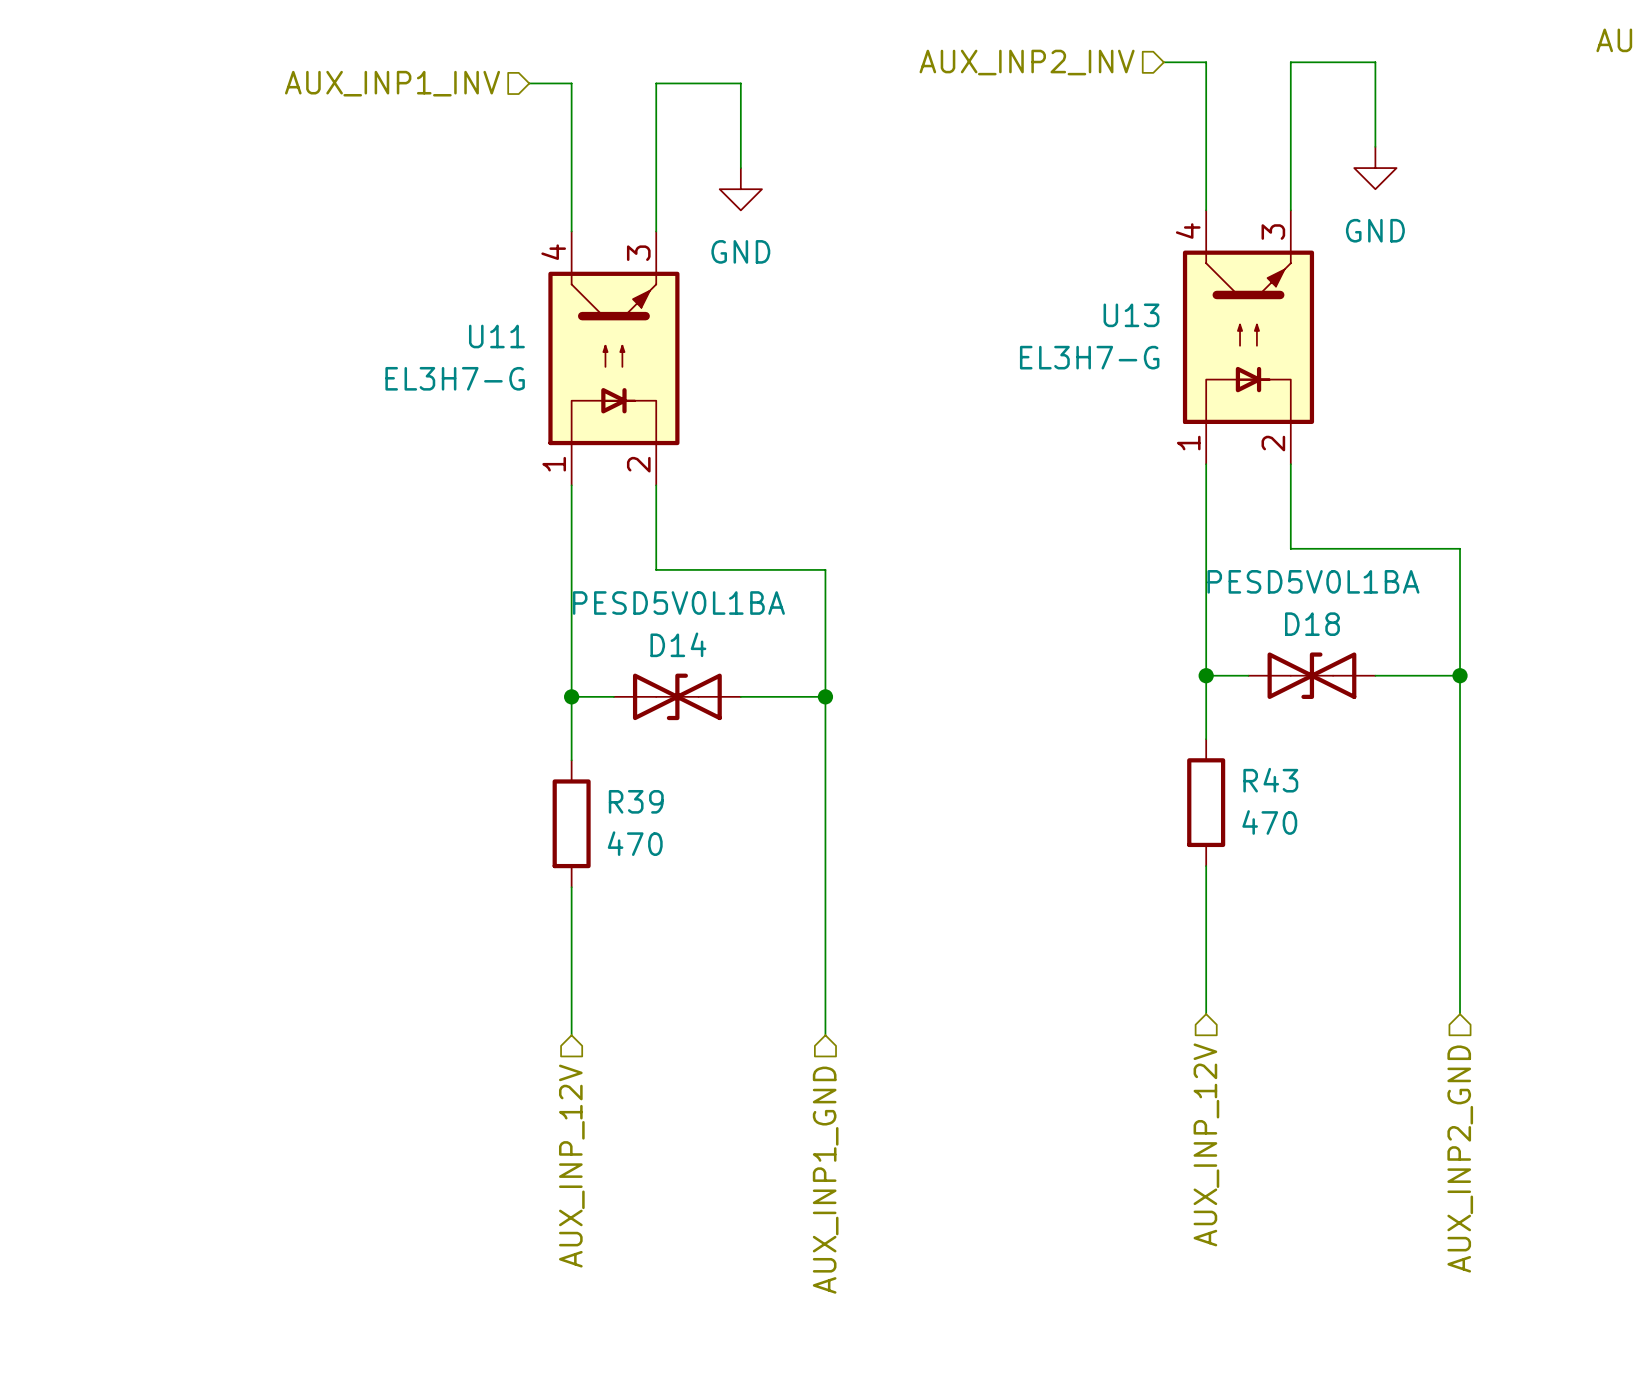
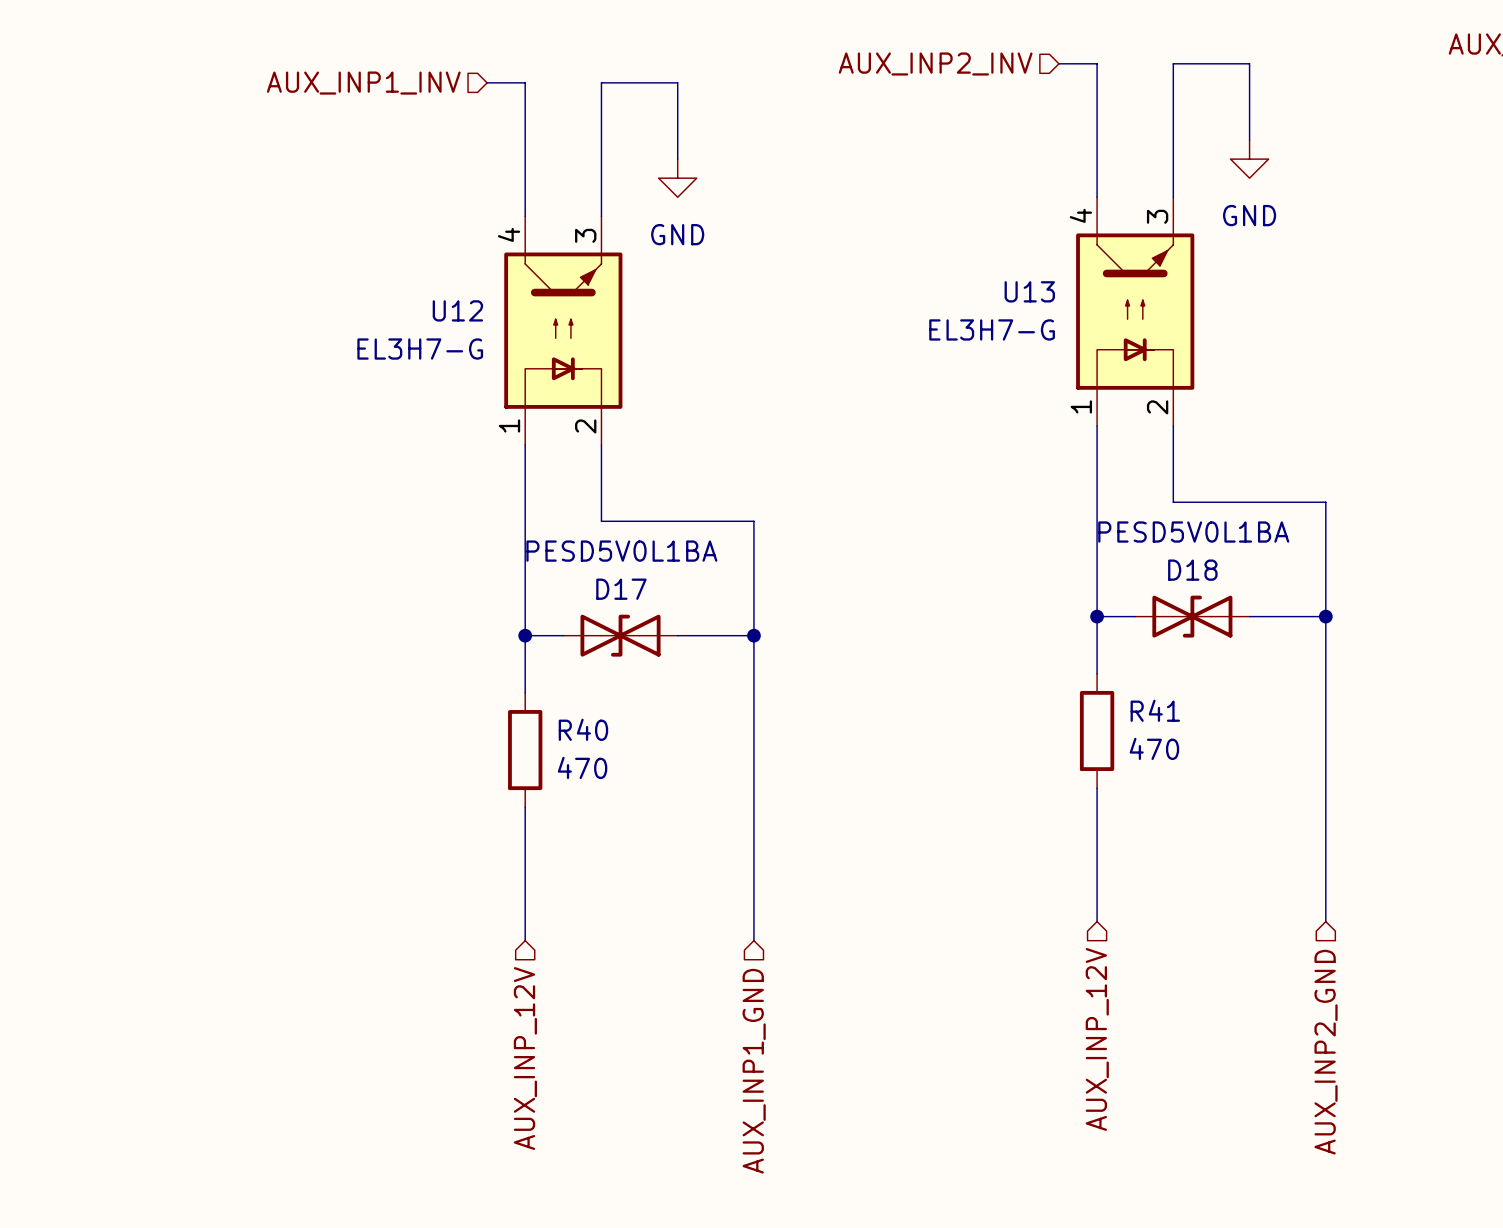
U11 name: U11 (496, 336) -> U12 (457, 310)
D14 name: D14 (678, 644) -> D17 (621, 589)
R43 name: R43 (1270, 780) -> R41 (1155, 710)
R39 name: R39 (636, 801) -> R40 (583, 729)

